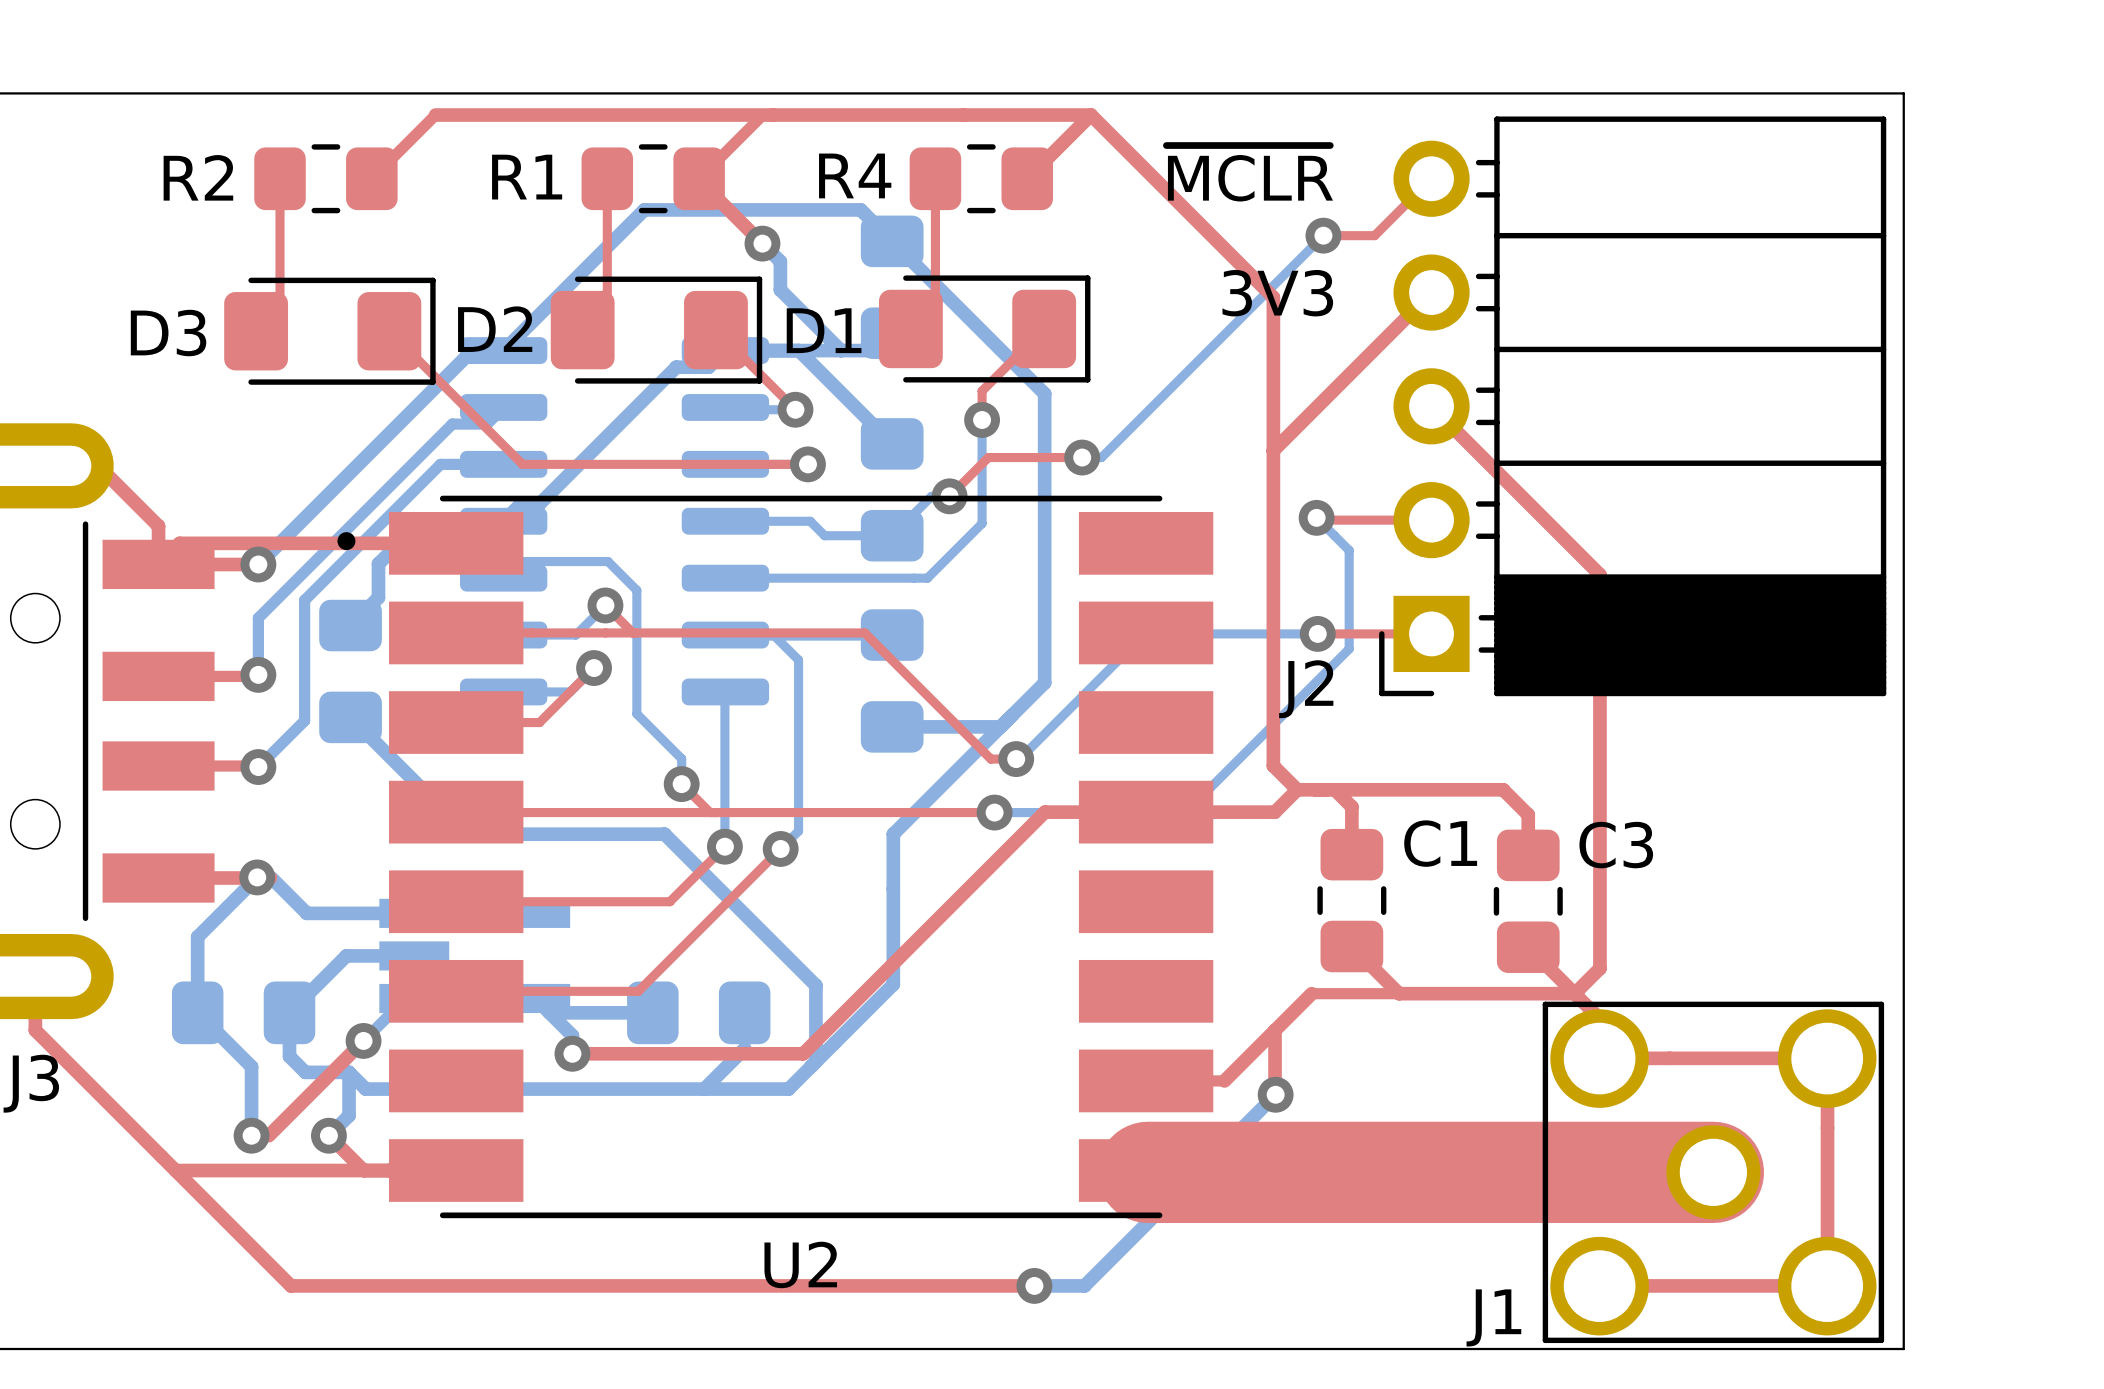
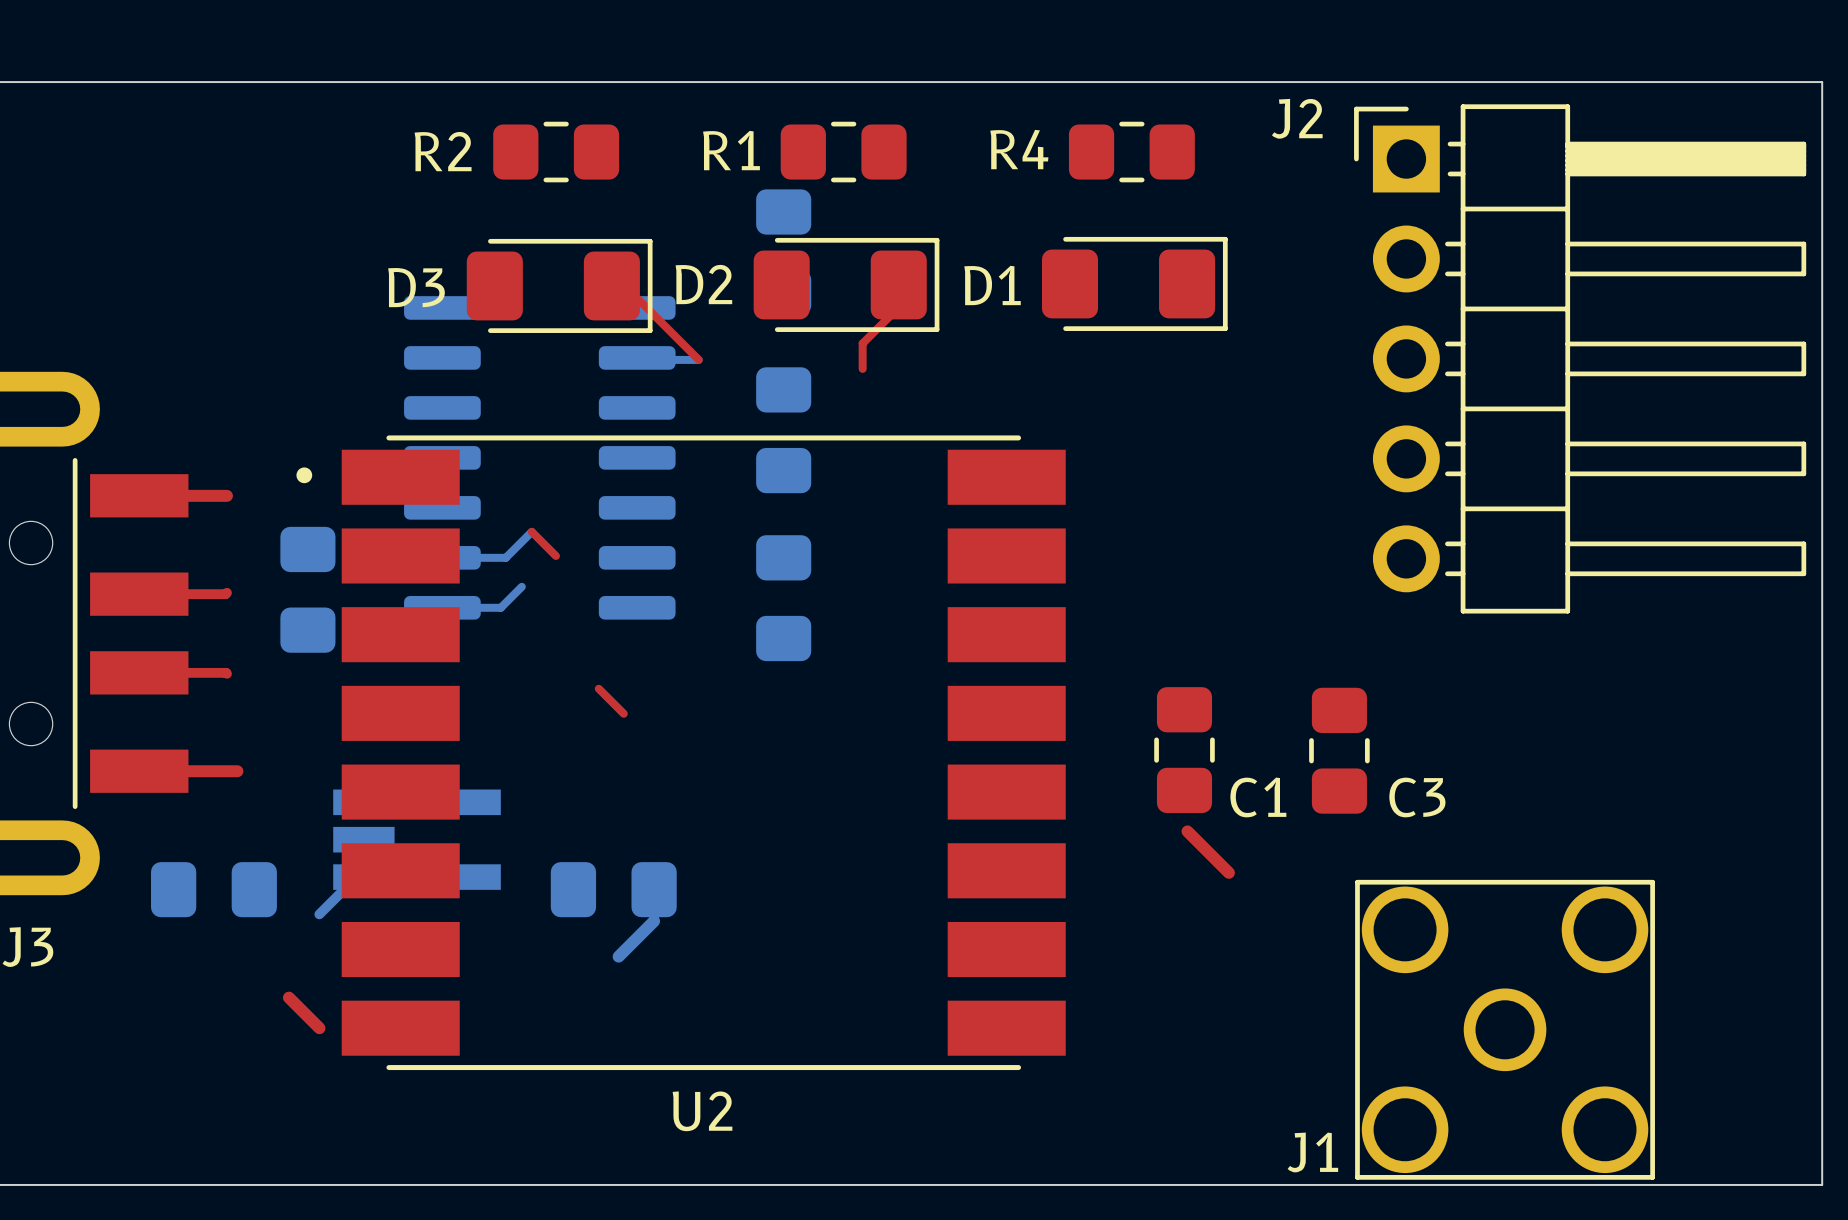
board edge: (1903, 93) (1903, 1349) -> (1672, 82) (1822, 82) (1822, 1184) (1672, 1184)
top track: (772, 115) (762, 115) (699, 178) (762, 243) -> none
top track: (1090, 115) (435, 115) (371, 178) -> none
top track: (1090, 115) (1027, 178) -> none
top track: (1090, 115) (1273, 297) (1273, 765) (1297, 789) -> none
J2 footprint: [1379, 116, 1887, 697] -> [1354, 104, 1807, 614]
text: ~{MCLR} (1249, 173) -> none
top track: (280, 178) (280, 307) (256, 331) -> none
R2 position: (325, 178) -> (556, 152)
top track: (607, 178) (607, 305) (582, 330) -> none
R1 position: (653, 178) -> (843, 152)
top track: (935, 178) (935, 304) (910, 328) -> none
R4 position: (981, 178) -> (1131, 152)
top track: (1431, 178) (1374, 235) (1323, 235) -> none
bottom track: (1323, 235) (1101, 457) (1082, 457) -> none
via: (1323, 235) -> none
bottom track: (762, 243) (780, 261) (780, 289) (840, 350) -> none
via: (762, 243) -> none
top track: (1431, 292) (1273, 450) -> none
text: 3V3 (1277, 293) -> none
D1 position: (984, 328) -> (1134, 283)
D2 position: (656, 330) -> (846, 284)
D3 position: (329, 331) -> (559, 285)
top track: (389, 331) (522, 464) (807, 464) -> none
bottom track: (892, 333) (874, 350) (725, 350) (708, 367) (676, 367) (538, 504) (520, 504) (503, 521) (421, 521) (378, 563) (378, 597) (350, 625) -> none
bottom track: (798, 350) (892, 443) -> none
top track: (1431, 406) (1599, 574) (1599, 968) (1574, 993) (1311, 993) (1224, 1080) (1146, 1080) -> none
bottom track: (503, 407) (487, 424) (452, 424) (258, 618) (258, 674) -> none
via: (795, 409) -> none
bottom track: (982, 419) (982, 523) (927, 578) (725, 578) -> none
via: (982, 419) -> none
top track: (1082, 457) (988, 457) (949, 496) -> none
via: (1082, 457) -> none
bottom track: (503, 464) (440, 464) (304, 600) (304, 720) (258, 767) -> none
via: (807, 464) -> none
top track: (71, 465) (35, 465) (98, 465) (158, 526) (158, 564) (179, 543) (456, 543) -> none
bottom track: (949, 496) (931, 496) (892, 535) (824, 535) (810, 521) (725, 521) -> none
via: (949, 496) -> none
bottom track: (1316, 517) (1349, 550) (1349, 649) (1185, 812) (994, 812) -> none
top track: (1316, 517) (1318, 520) (1431, 520) -> none
via: (1316, 517) -> none
bottom track: (258, 564) (472, 350) (503, 350) (644, 209) (860, 209) (1044, 393) (1044, 682) (893, 834) (893, 984) (788, 1089) (365, 1089) (349, 1072) -> none
via: (258, 564) -> none
bottom track: (503, 578) (520, 561) (608, 561) (636, 590) (636, 713) (681, 758) (681, 784) -> none
via: (605, 605) -> none
top track: (456, 632) (864, 632) (990, 759) (1016, 759) -> none
bottom track: (1317, 633) (1144, 633) (1019, 759) (1016, 759) -> none
top track: (1317, 633) (1431, 633) -> none
via: (1317, 633) -> none
bottom track: (892, 635) (725, 635) (773, 635) (798, 660) (798, 831) (780, 848) -> none
top track: (594, 668) (539, 722) (456, 722) -> none
via: (594, 668) -> none
via: (258, 674) -> none
J2 name position: J2 (1306, 689) -> J2 (1297, 118)
bottom track: (724, 692) (724, 846) -> none
bottom track: (892, 726) (1000, 726) -> none
bottom track: (350, 734) (350, 717) (467, 834) (664, 834) (815, 985) (815, 1061) -> none
via: (1016, 759) -> none
via: (258, 767) -> none
via: (681, 784) -> none
top track: (1297, 789) (1274, 812) (1044, 812) (803, 1053) (572, 1053) -> none
top track: (1297, 789) (1503, 789) (1528, 814) (1528, 855) -> none
top track: (1334, 789) (1351, 806) (1351, 854) -> none
top track: (456, 812) (994, 812) -> none
via: (994, 812) -> none
C1 name position: C1 (1440, 843) -> C1 (1258, 797)
C3 name position: C3 (1616, 845) -> C3 (1417, 797)
top track: (724, 846) (669, 901) (456, 901) -> none
via: (724, 846) -> none
top track: (780, 848) (638, 991) (456, 991) -> none
via: (780, 848) -> none
bottom track: (257, 877) (197, 936) (197, 1012) (251, 1066) (251, 1135) -> none
via: (257, 877) -> none
bottom track: (270, 877) (306, 913) (414, 913) -> none
C1 position: (1351, 900) -> (1184, 750)
C3 position: (1528, 901) -> (1339, 750)
top track: (1528, 947) (1599, 1018) (1599, 1058) (1827, 1058) (1827, 1285) (1599, 1285) -> none
bottom track: (414, 955) (346, 955) (289, 1012) (289, 1056) (305, 1072) (349, 1072) -> none
top track: (35, 976) (35, 1030) (290, 1285) (1034, 1285) -> none
bottom track: (652, 1012) (549, 1012) (535, 998) (572, 1035) (572, 1053) -> none
top track: (1275, 1030) (1275, 1094) -> none
top track: (363, 1040) (268, 1135) (251, 1135) -> none
via: (363, 1040) -> none
via: (572, 1053) -> none
bottom track: (349, 1072) (349, 1115) (328, 1135) -> none
bottom track: (1275, 1094) (1084, 1285) (1034, 1285) -> none
via: (1275, 1094) -> none
via: (251, 1135) -> none
via: (328, 1135) -> none
top track: (161, 1156) (175, 1170) (456, 1170) -> none
top track: (1146, 1170) (1147, 1172) (1713, 1172) -> none
via: (1034, 1285) -> none

